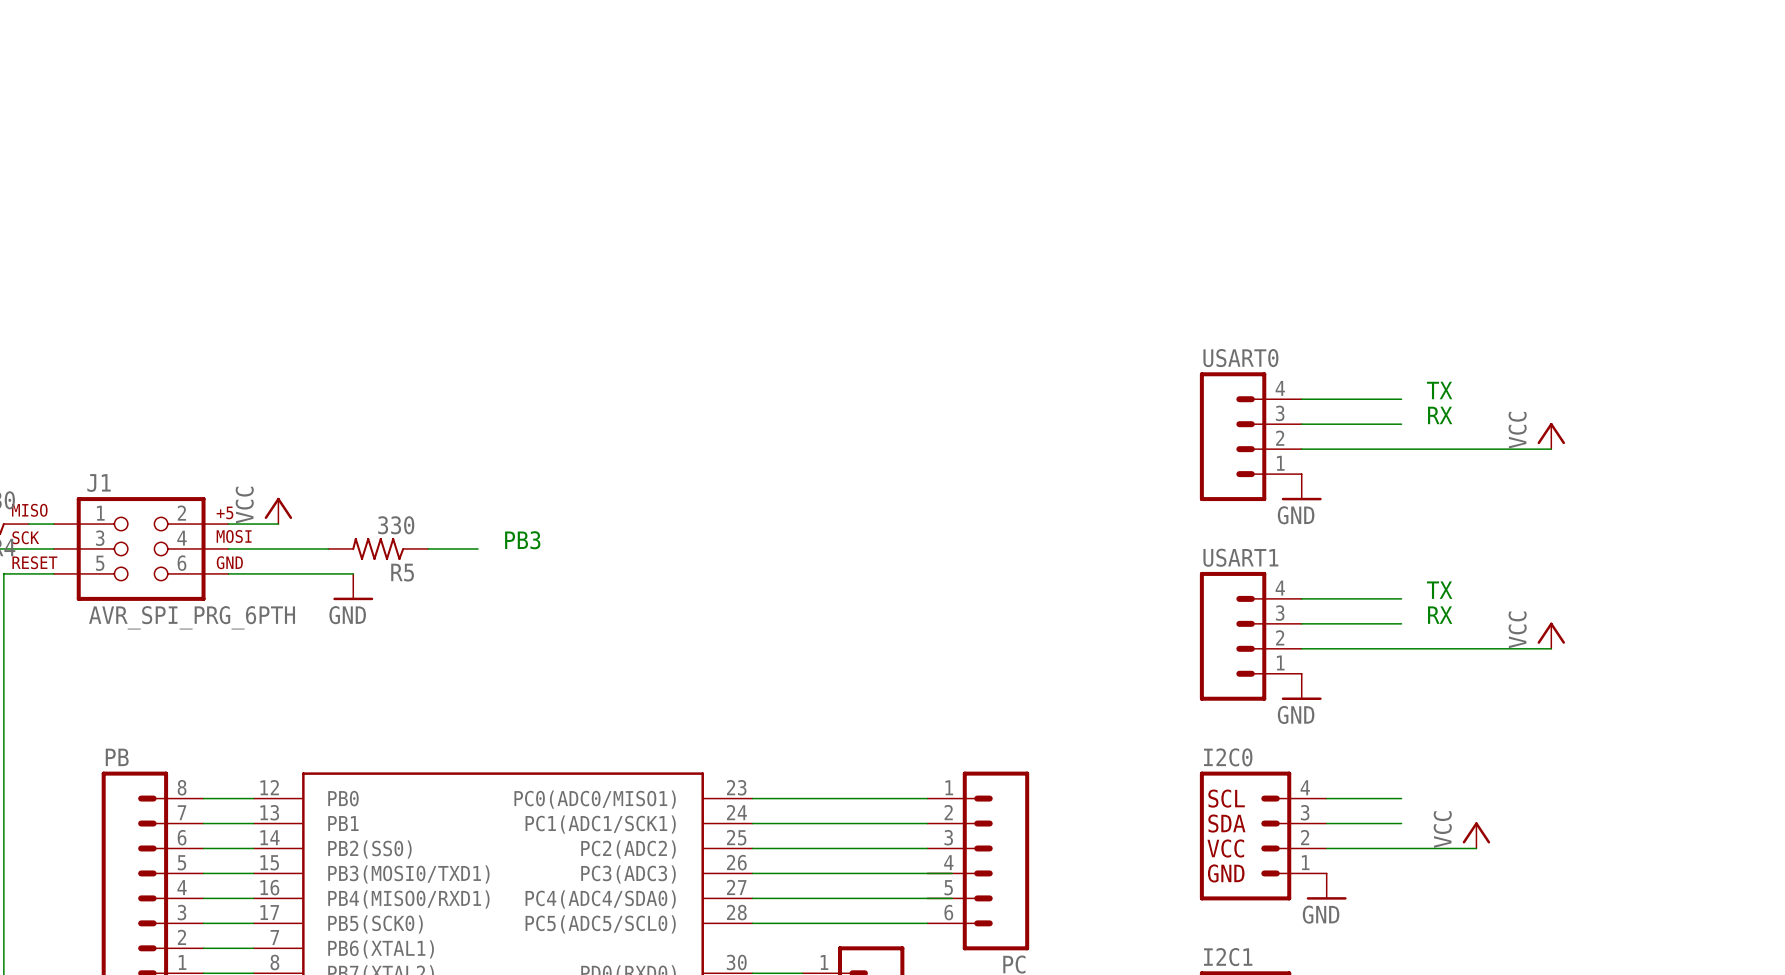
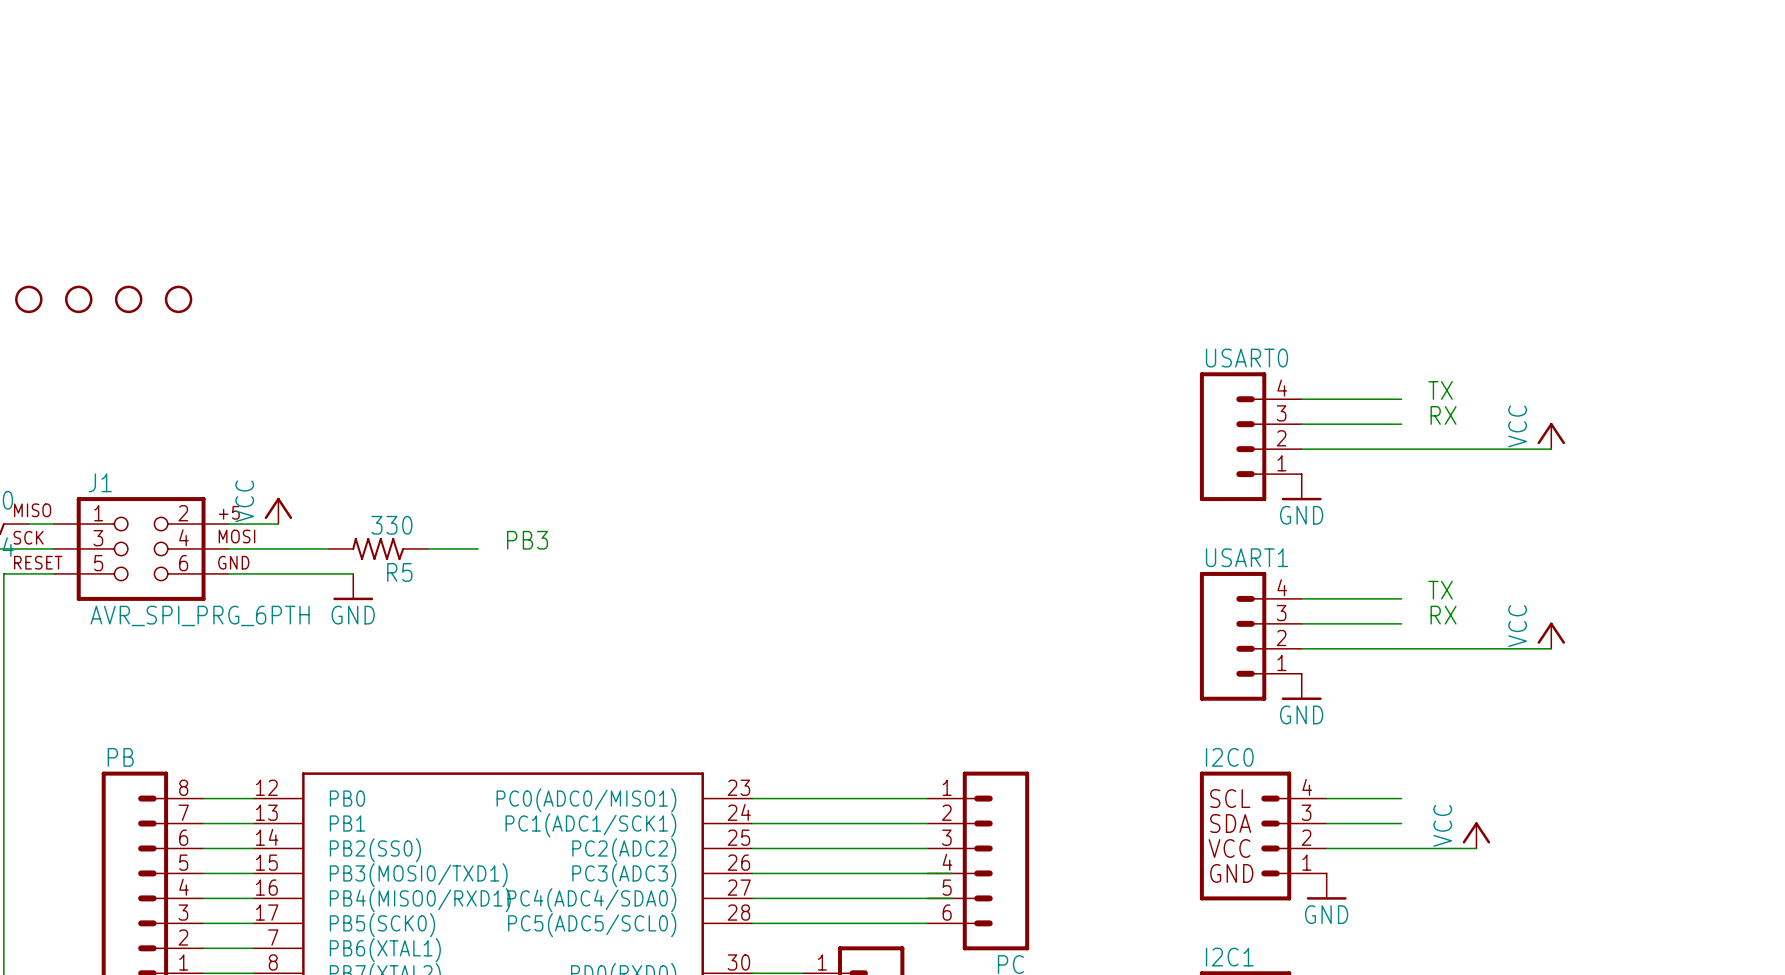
part: none -> (28, 299)
part: none -> (78, 299)
part: none -> (128, 299)
part: none -> (178, 299)

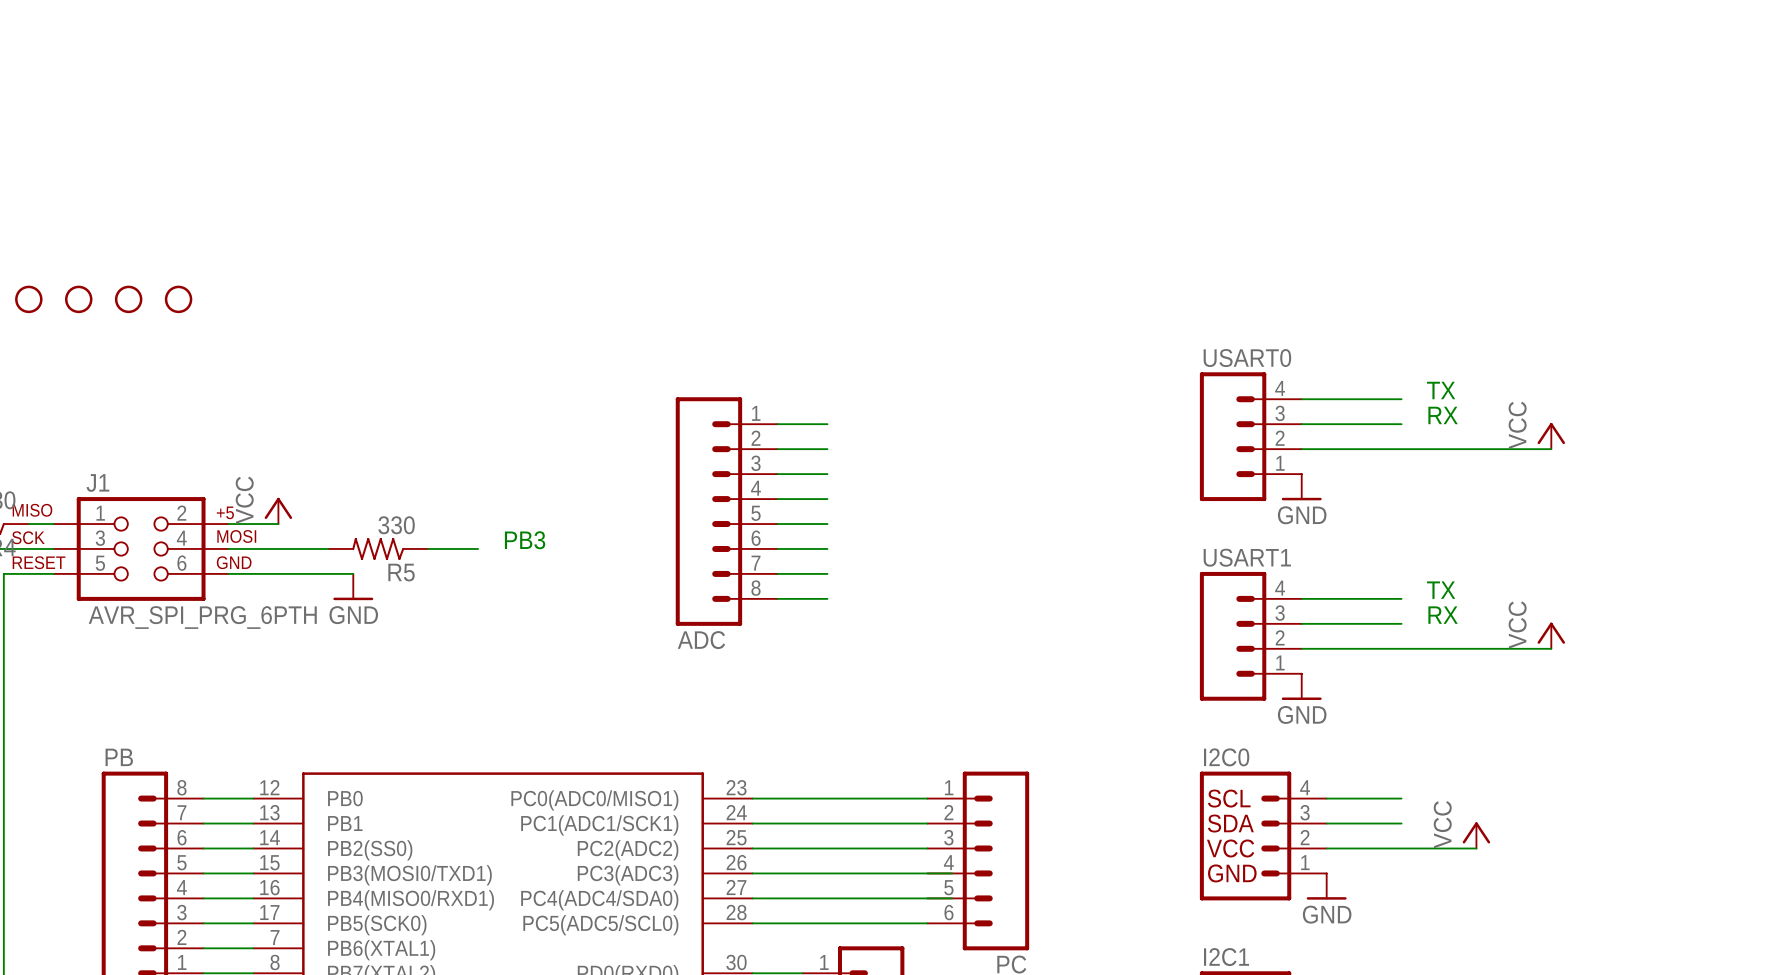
wire: none -> (777, 424) (827, 424)
wire: none -> (777, 449) (827, 449)
wire: none -> (777, 474) (827, 474)
wire: none -> (777, 499) (827, 499)
ADC: none -> (726, 511)
wire: none -> (777, 524) (827, 524)
wire: none -> (777, 548) (827, 548)
wire: none -> (777, 573) (827, 573)
wire: none -> (777, 598) (827, 598)

